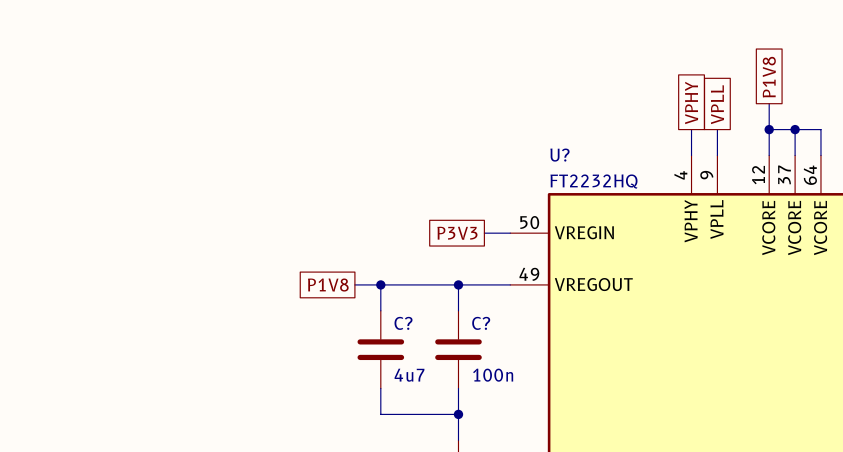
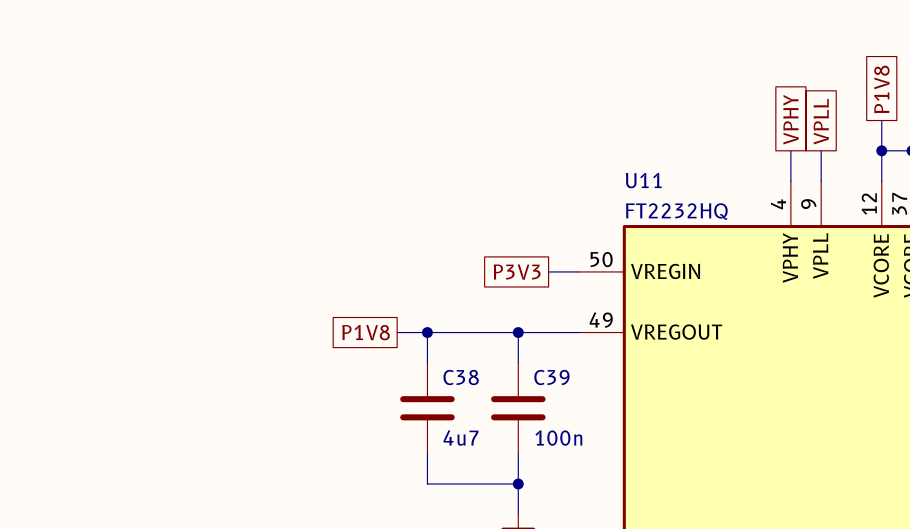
U? name: U? (559, 155) -> U11 (643, 180)
C? name: C? (403, 323) -> C38 (461, 377)
C? name: C? (481, 323) -> C39 (551, 377)

